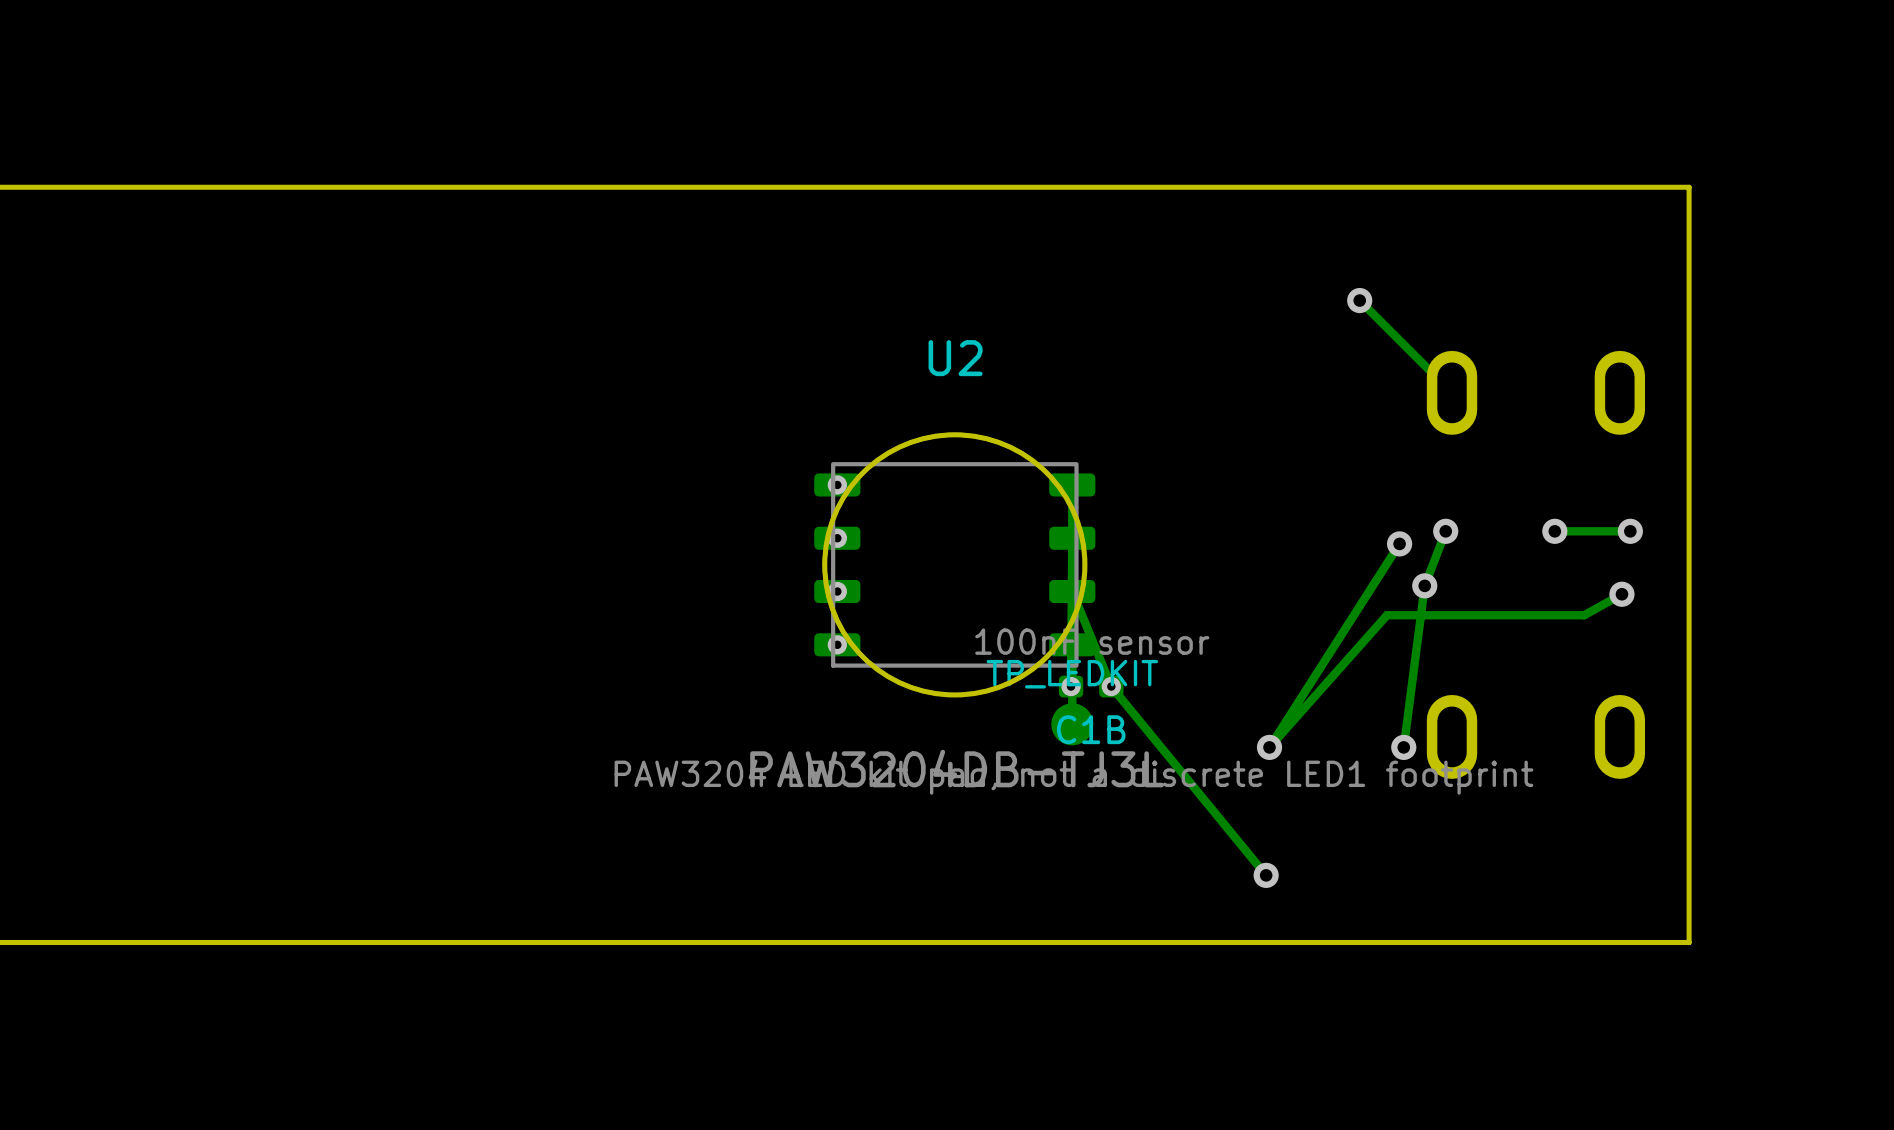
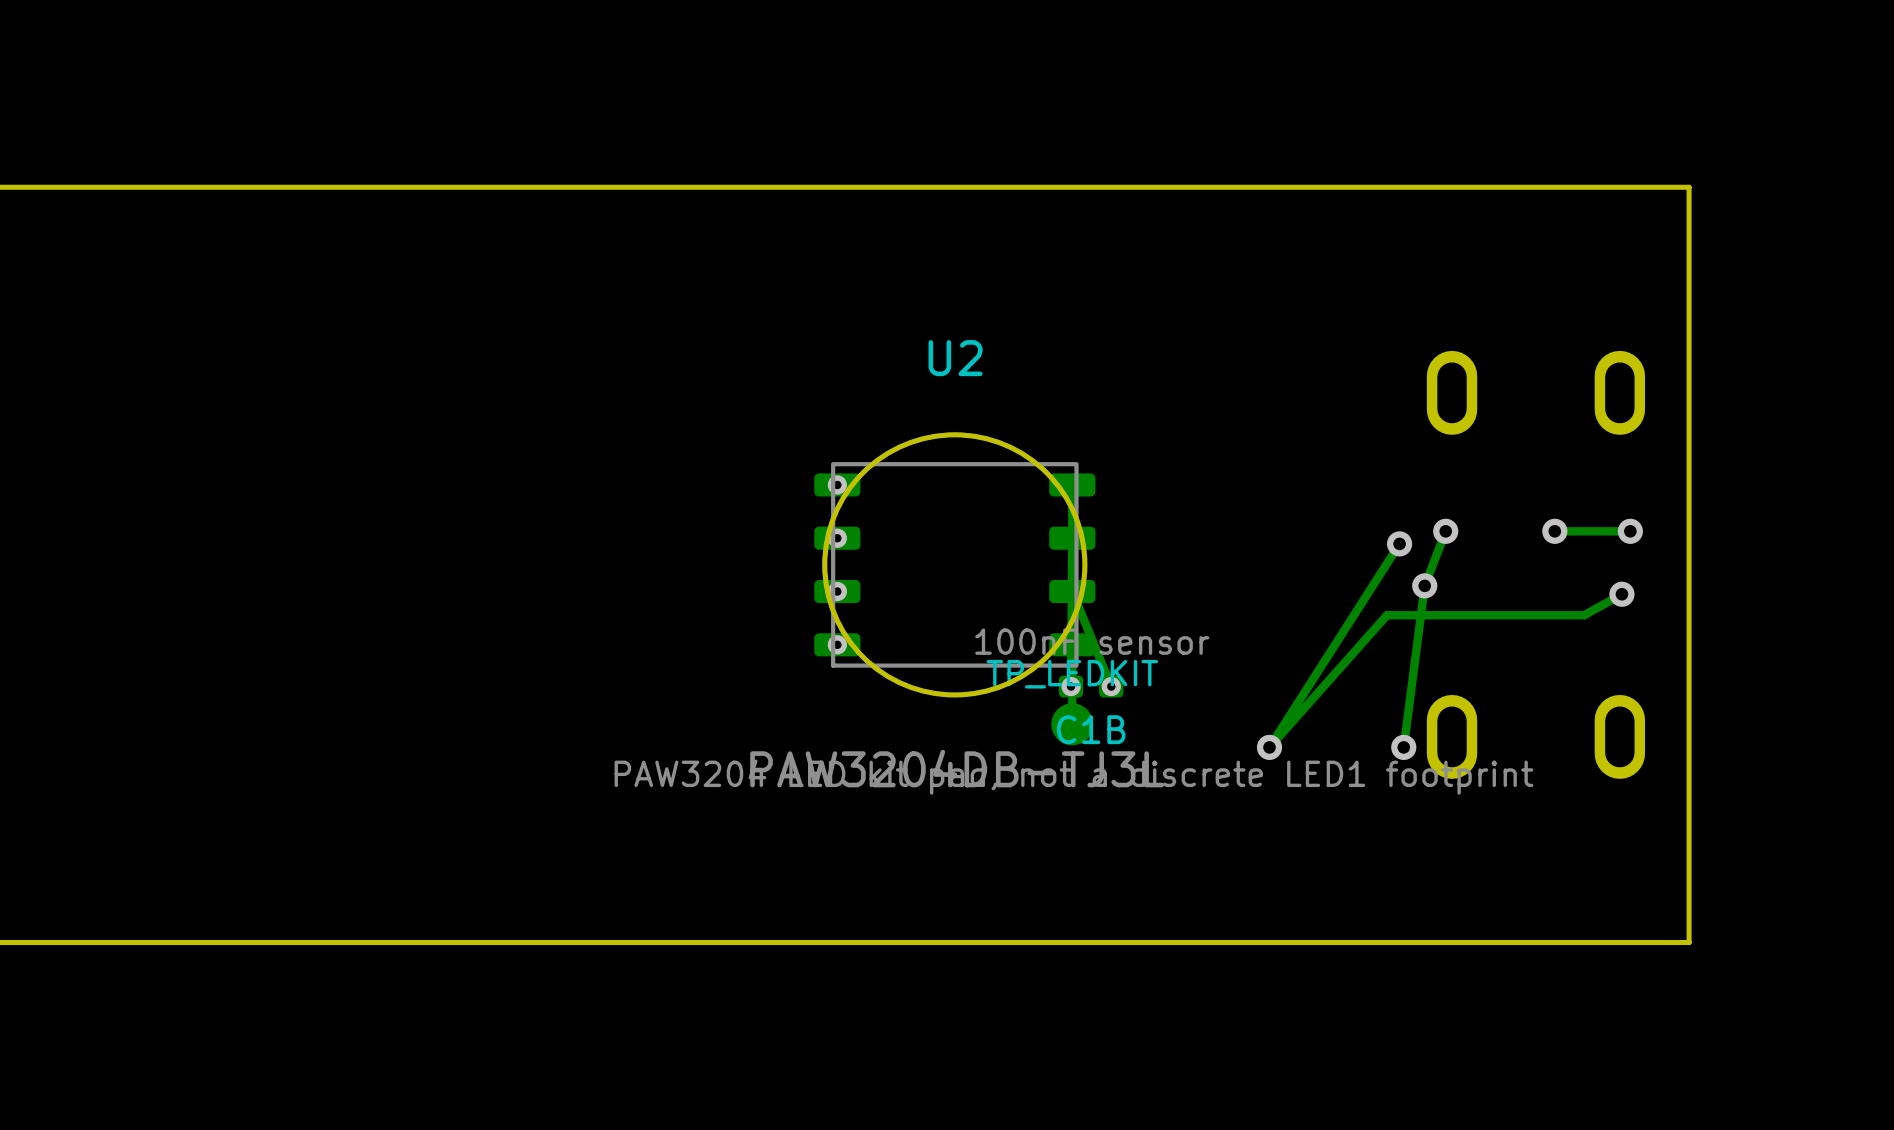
track: (1359, 300) (1452, 392) -> none
via: (1359, 300) -> none
track: (1111, 686) (1266, 875) -> none
via: (1266, 875) -> none

